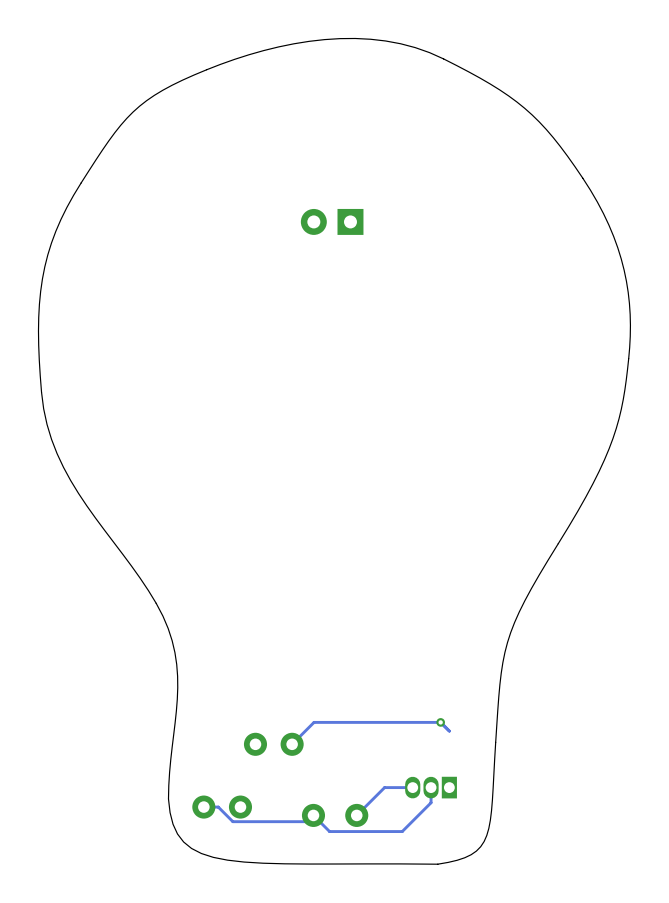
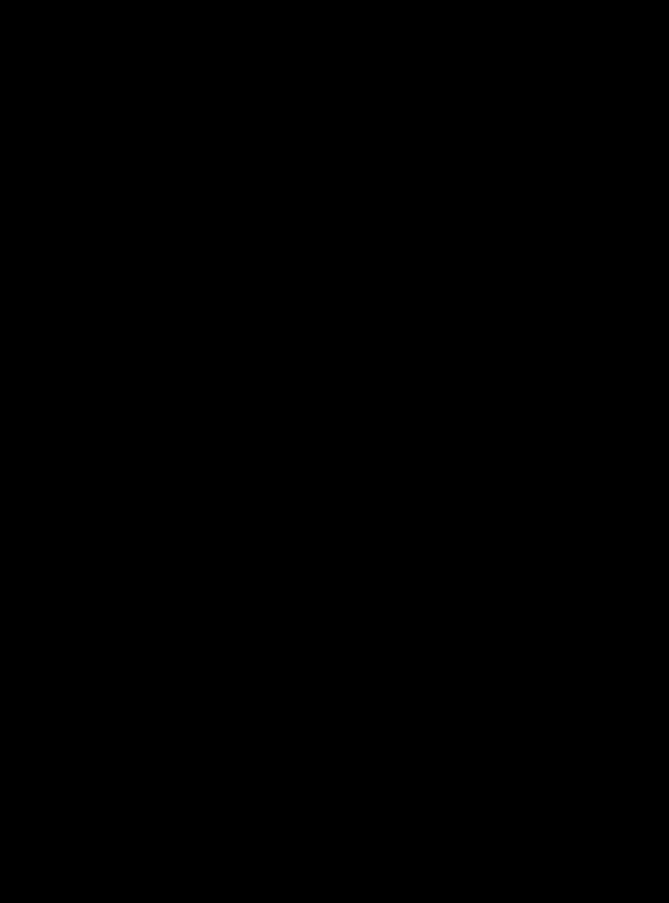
board edge: (443, 58) (415, 47) (385, 40) (355, 38) (324, 39) (293, 43) (248, 54) (206, 69) (172, 85) (139, 106) (108, 140) (66, 207) (47, 254) (40, 291) (38, 330) (41, 392) (47, 424) (57, 453) (70, 480) (148, 590) (168, 628) (174, 652) (177, 687) (169, 772) (170, 812) (177, 833) (183, 842) (191, 848) (213, 857) (263, 863) (437, 864) (464, 857) (480, 846) (486, 835) (490, 820) (499, 684) (504, 652) (510, 632) (531, 588) (592, 483) (616, 428) (626, 379) (630, 314) (624, 270) (608, 225) (582, 178) (560, 146) (539, 121) (499, 89) (443, 58) -> none
part: (332, 221) -> none
via: (440, 722) -> none
track: (449, 731) (440, 722) (314, 722) (292, 744) -> none
part: (273, 744) -> none
track: (412, 787) (384, 787) (356, 815) -> none
track: (431, 787) (431, 802) (402, 831) (329, 831) (313, 815) (307, 821) (232, 821) (218, 807) (203, 807) -> none
part: (431, 787) -> none
part: (222, 807) -> none
part: (335, 815) -> none

